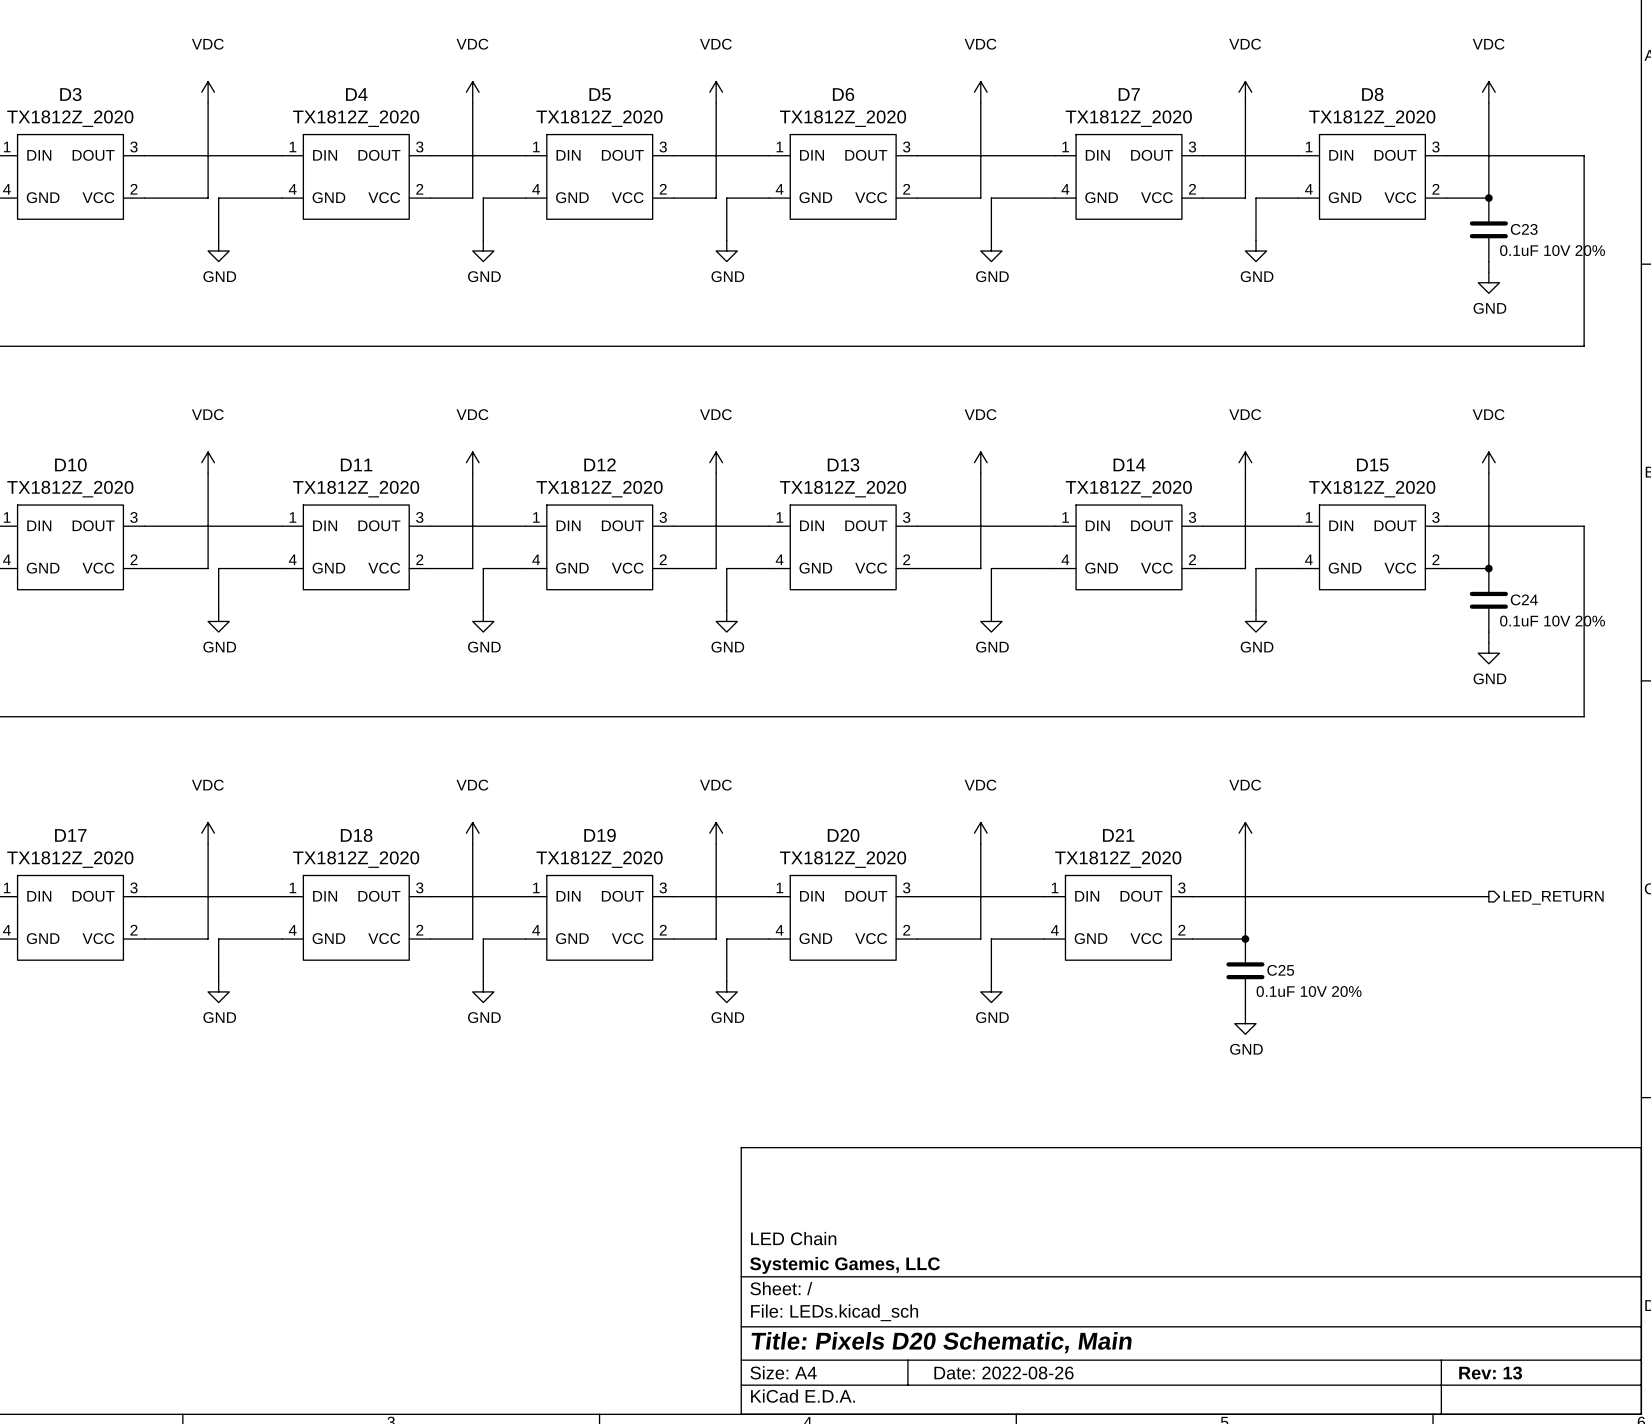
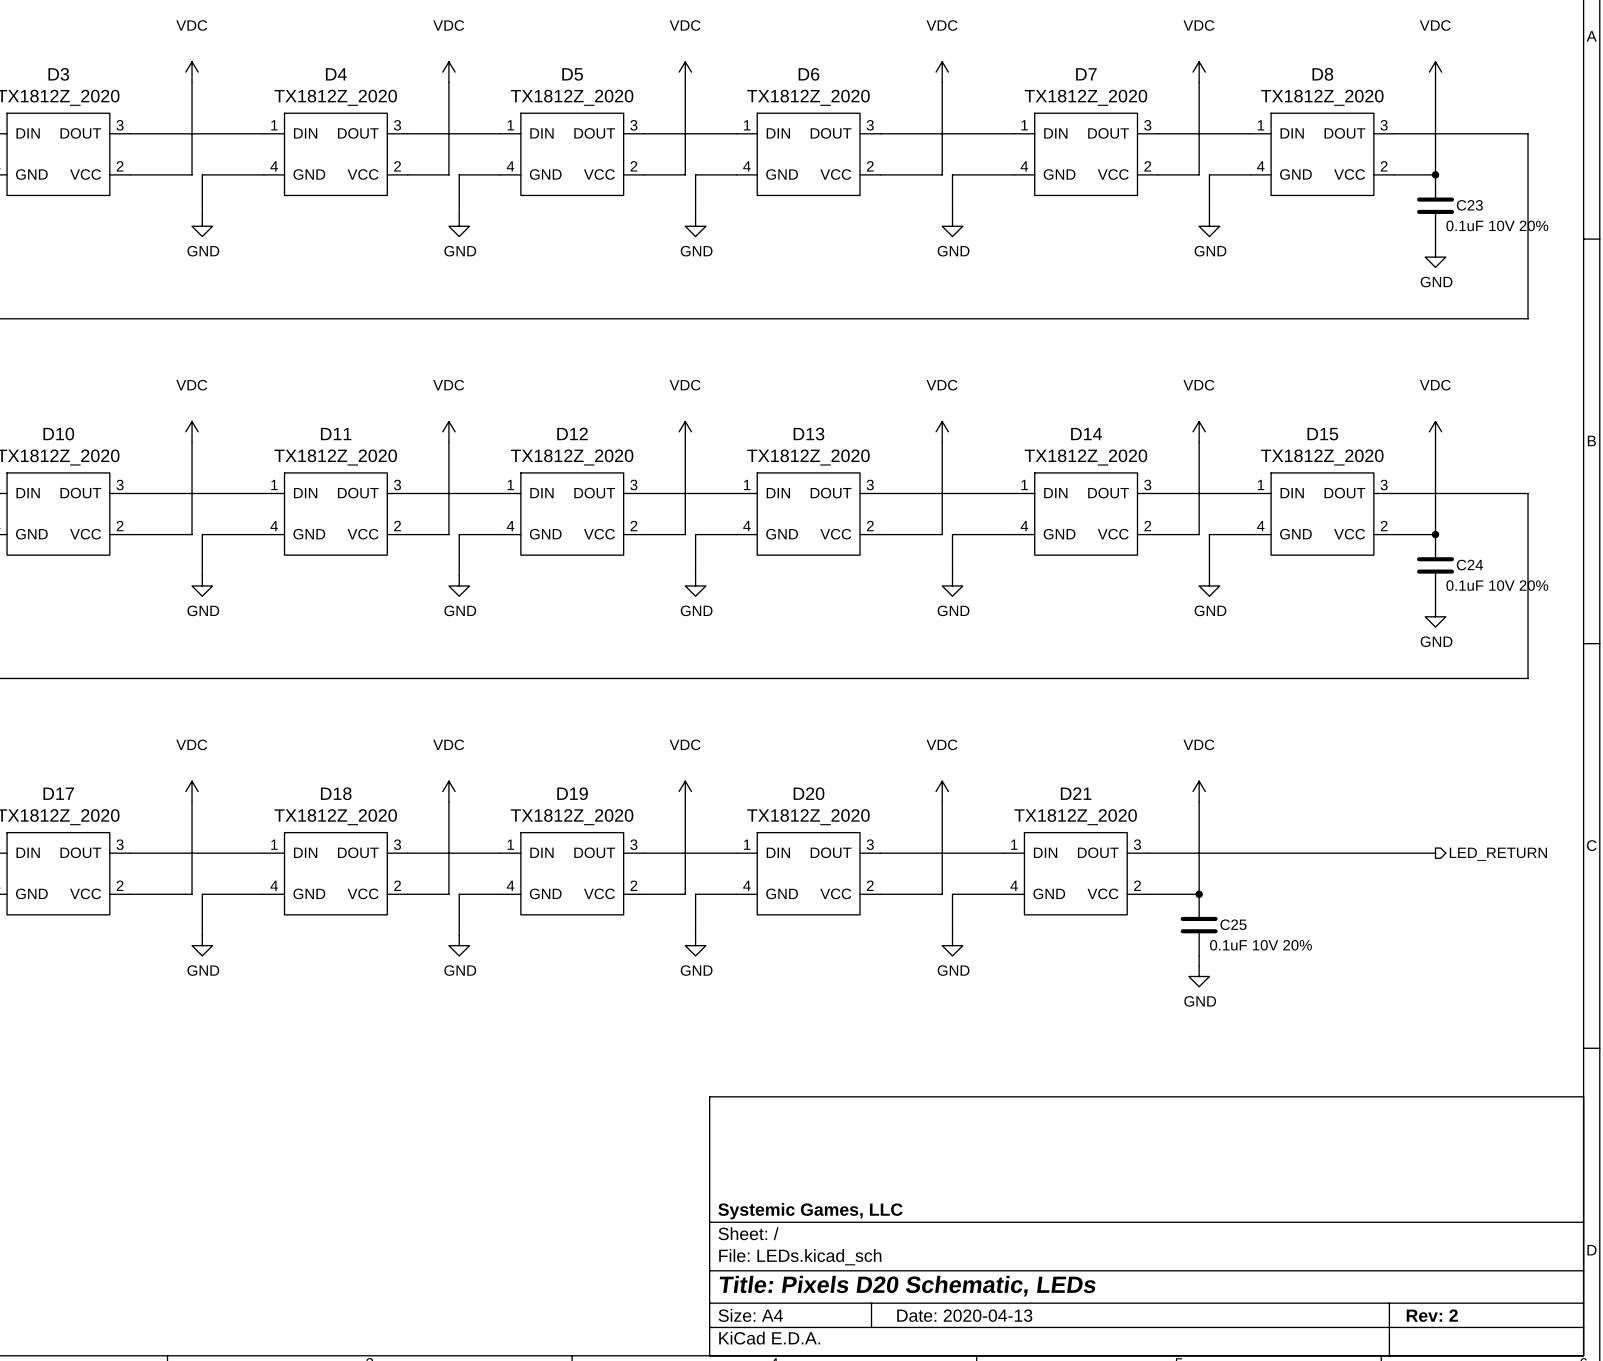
title block: LED Chain (793, 1238) -> none
title block: Title: Pixels D20 Schematic, Main (941, 1342) -> Title: Pixels D20 Schematic, LEDs (907, 1286)
title block: Date: 2022-08-26 (1004, 1373) -> Date: 2020-04-13 (964, 1315)
title block: Rev: 13 (1490, 1373) -> Rev: 2 (1432, 1315)

